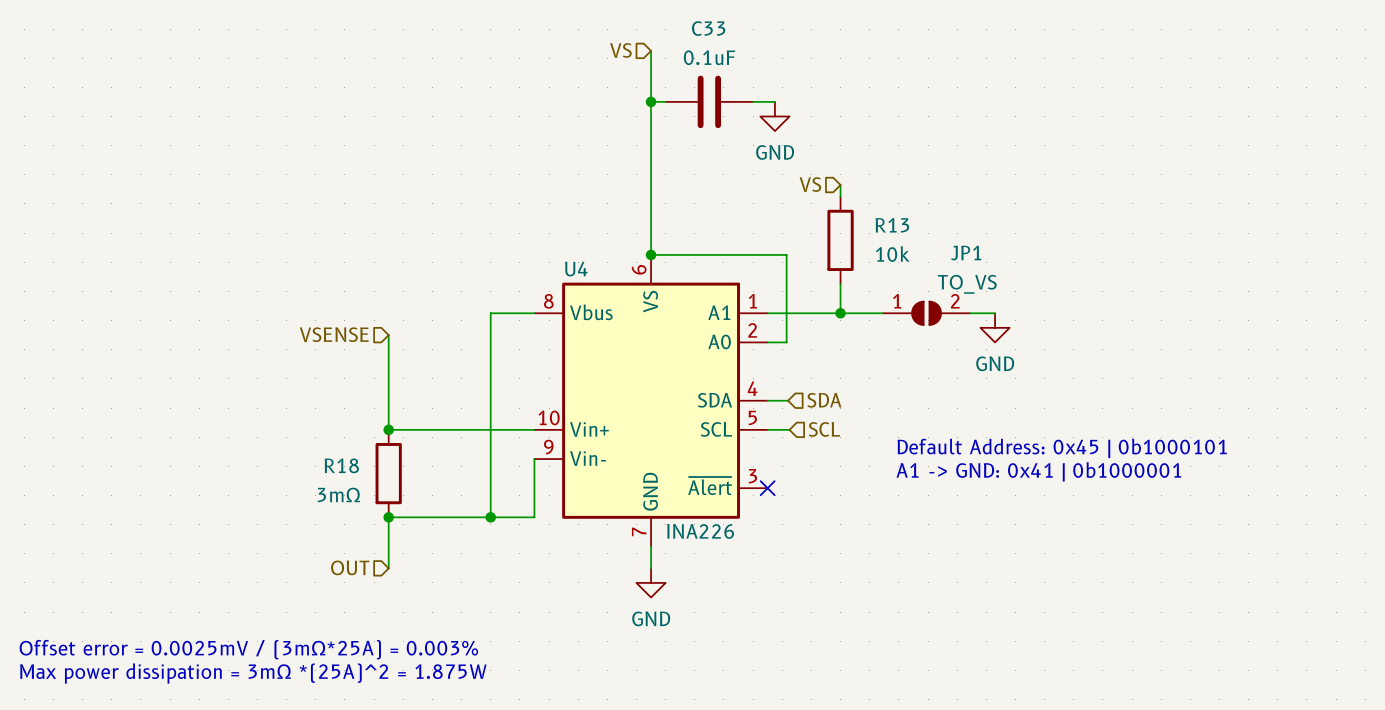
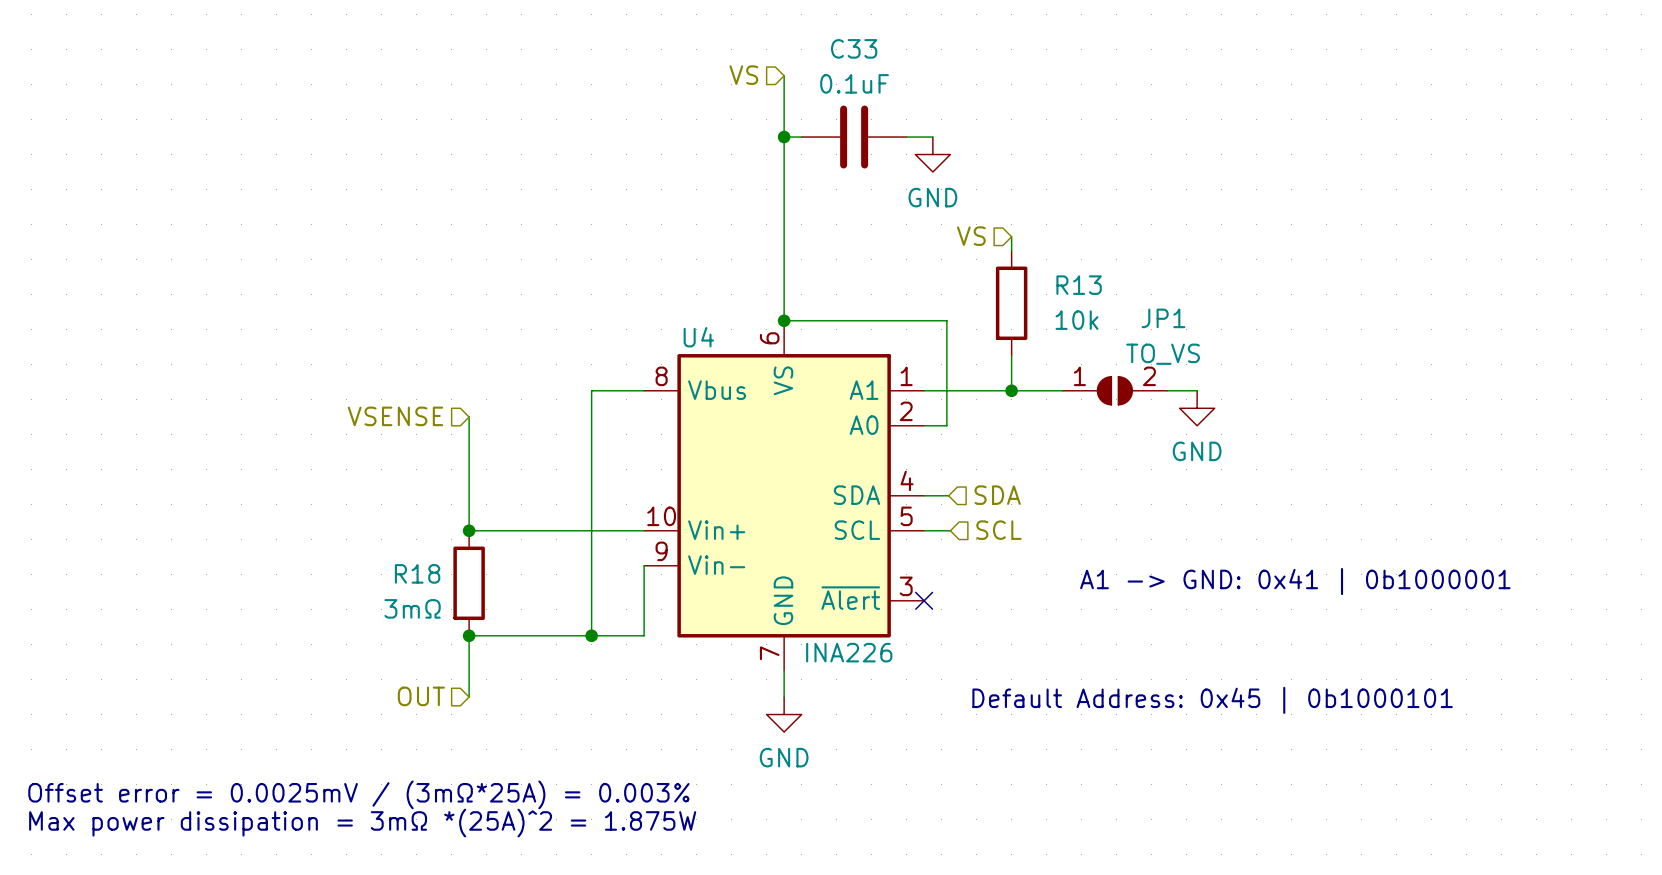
text position: Default Address: 0x45 | 0b1000101 (1062, 448) -> Default Address: 0x45 | 0b1000101 (1212, 700)

